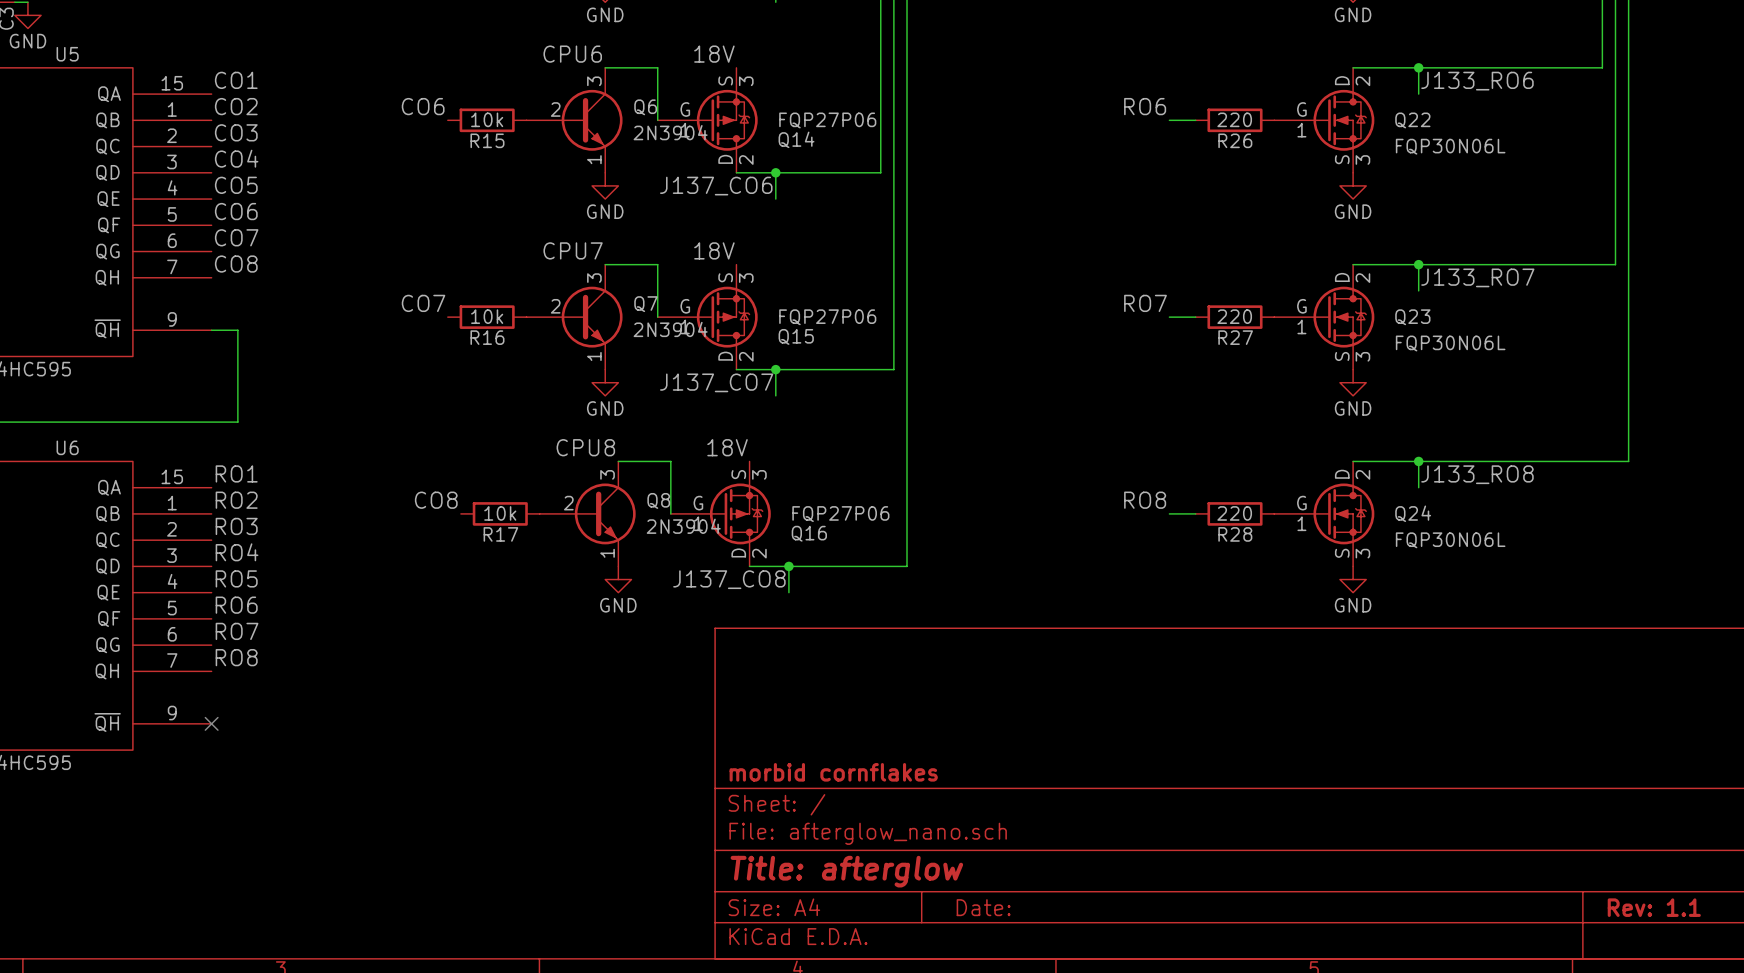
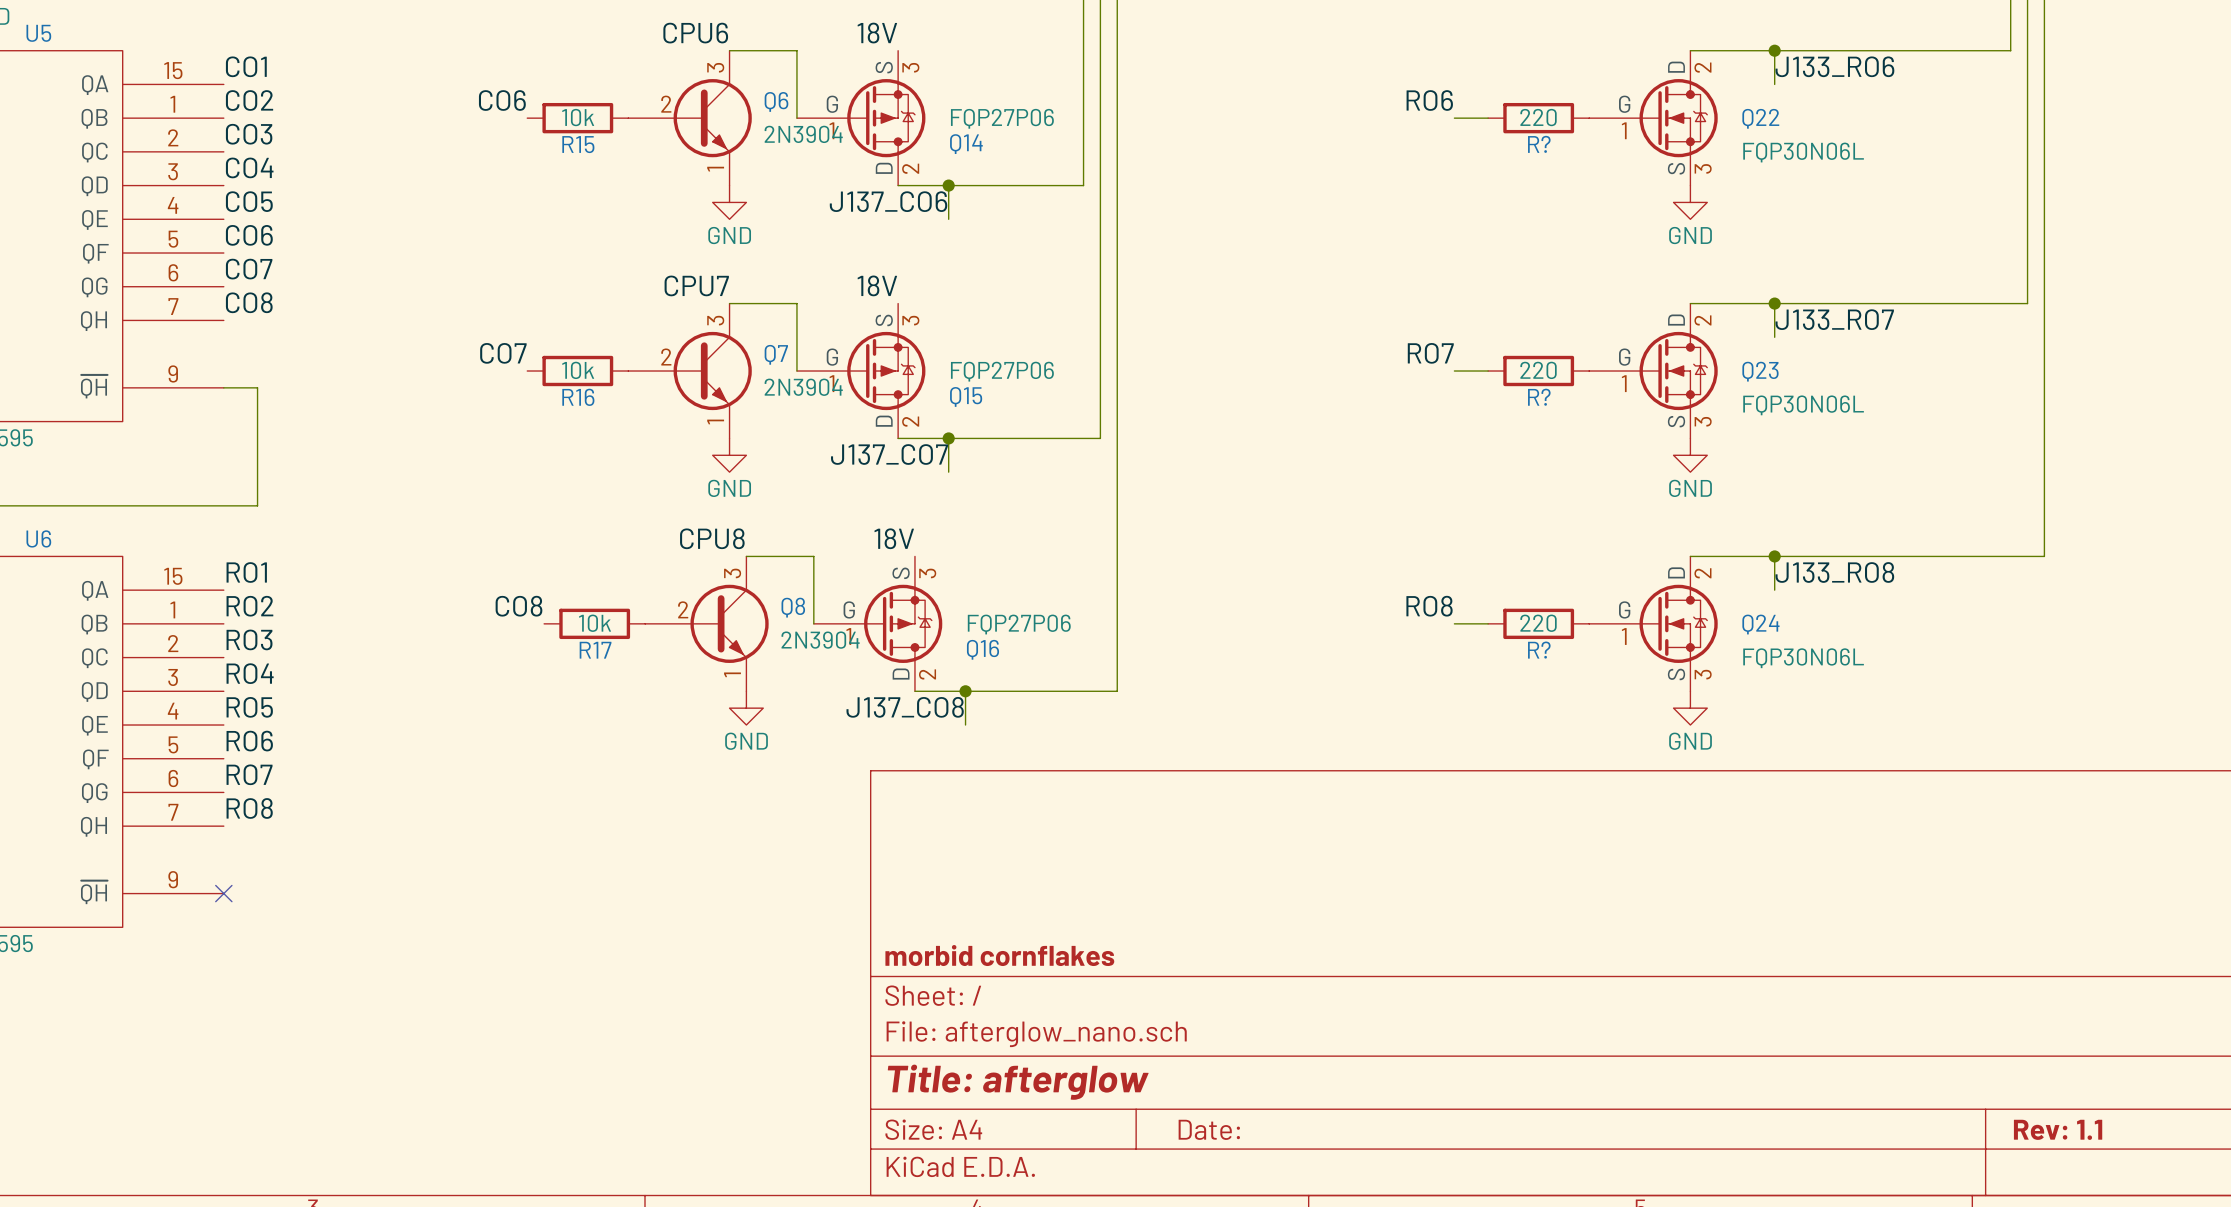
R26 name: R26 (1235, 140) -> R? (1539, 144)
R27 name: R27 (1235, 337) -> R? (1539, 397)
R28 name: R28 (1235, 534) -> R? (1539, 650)

